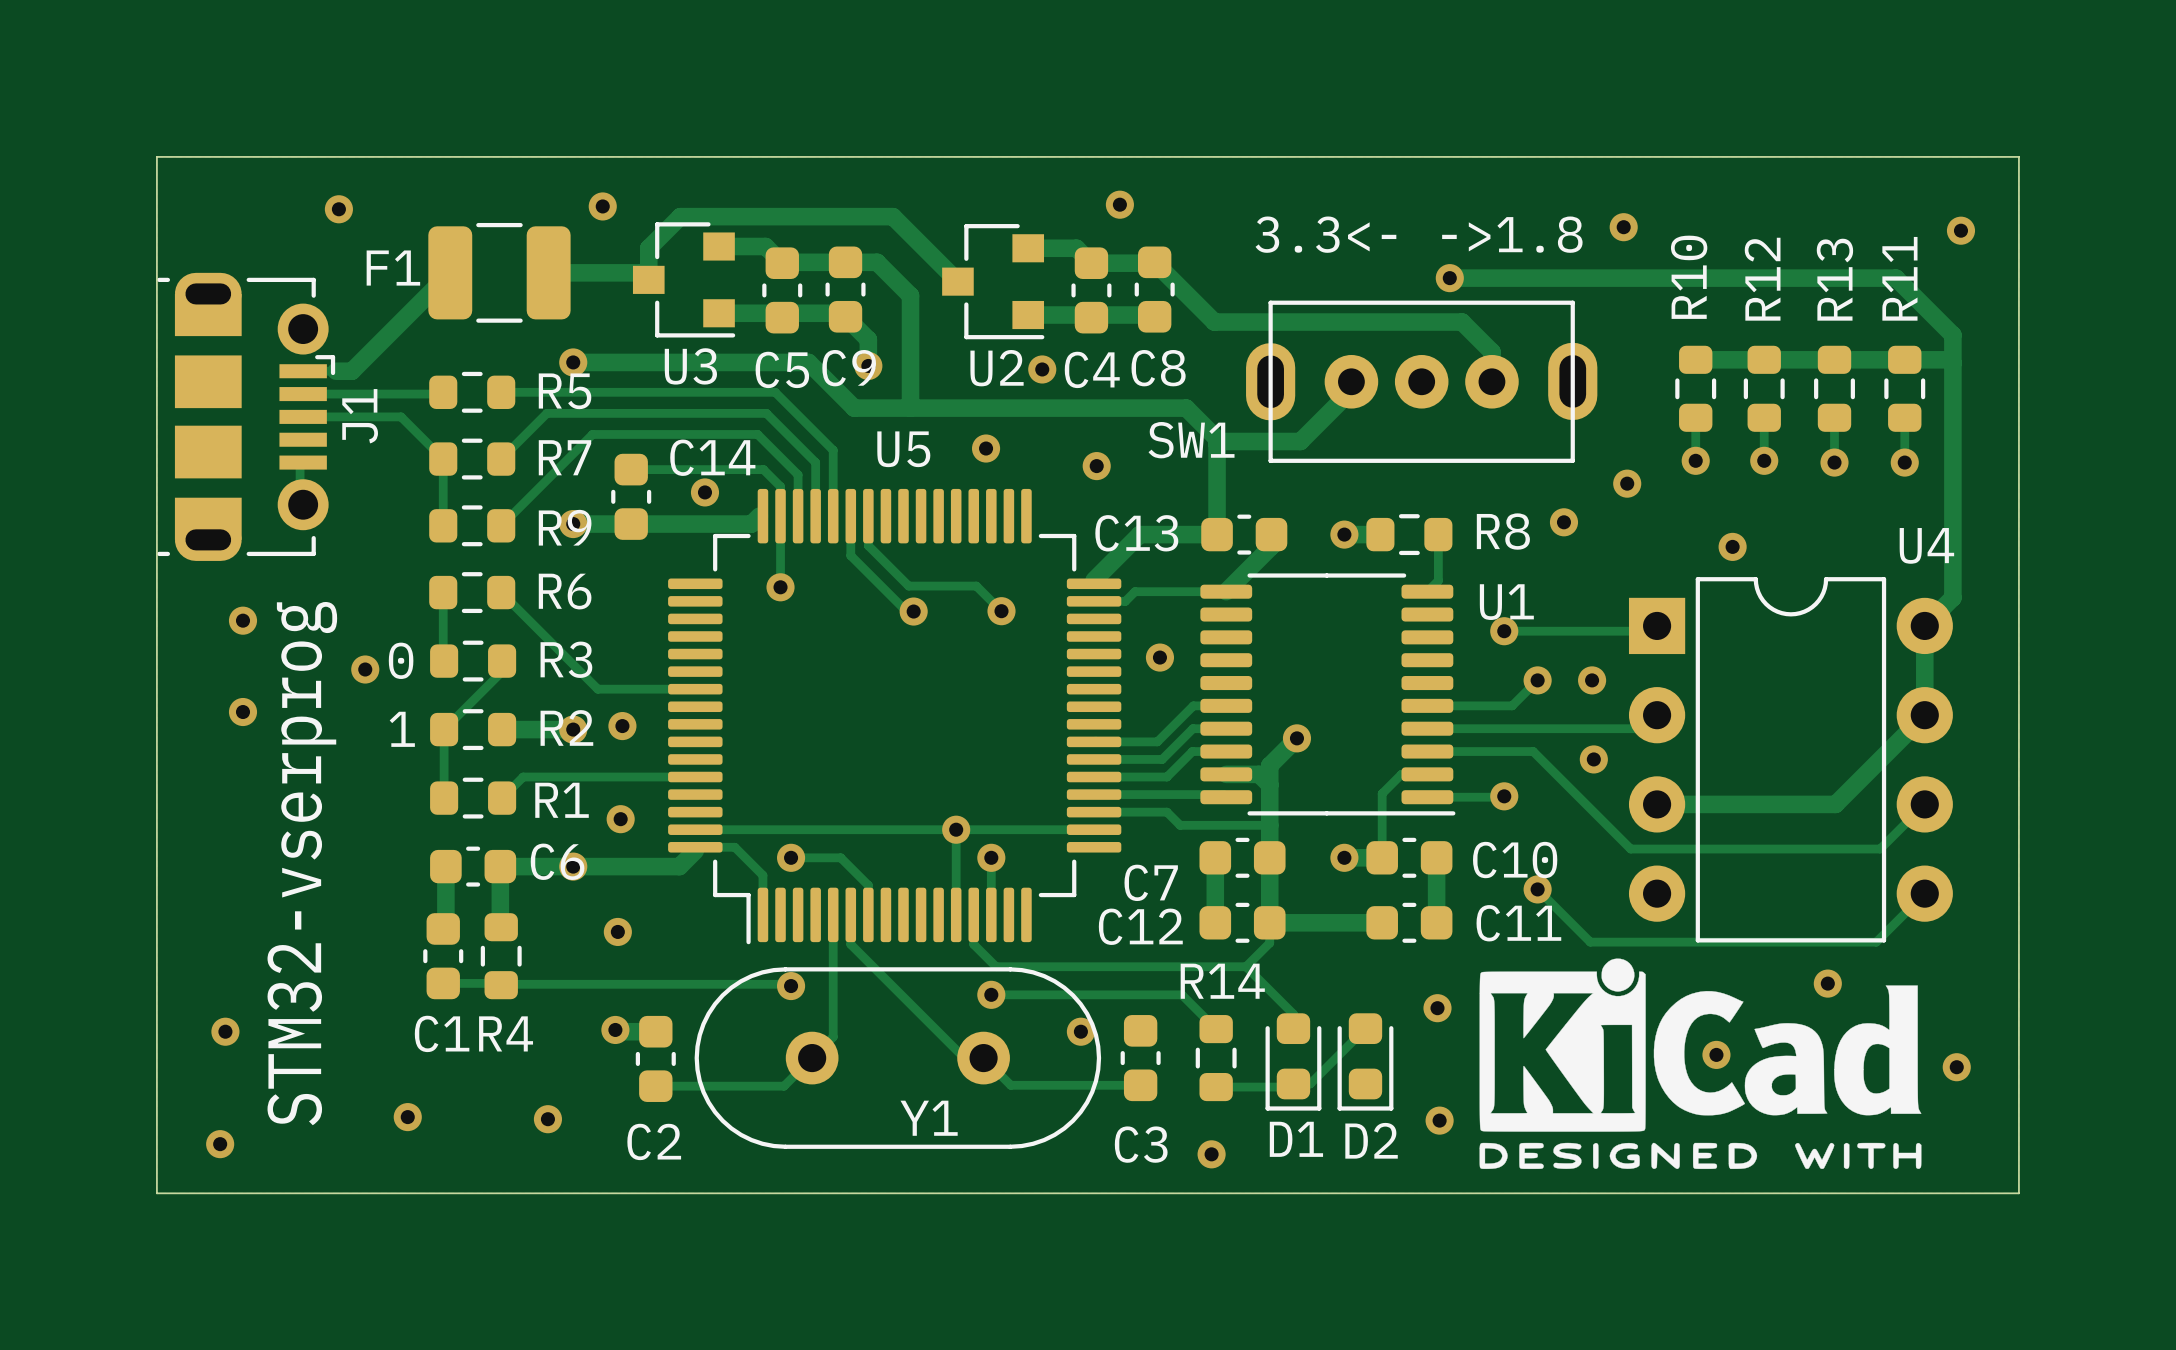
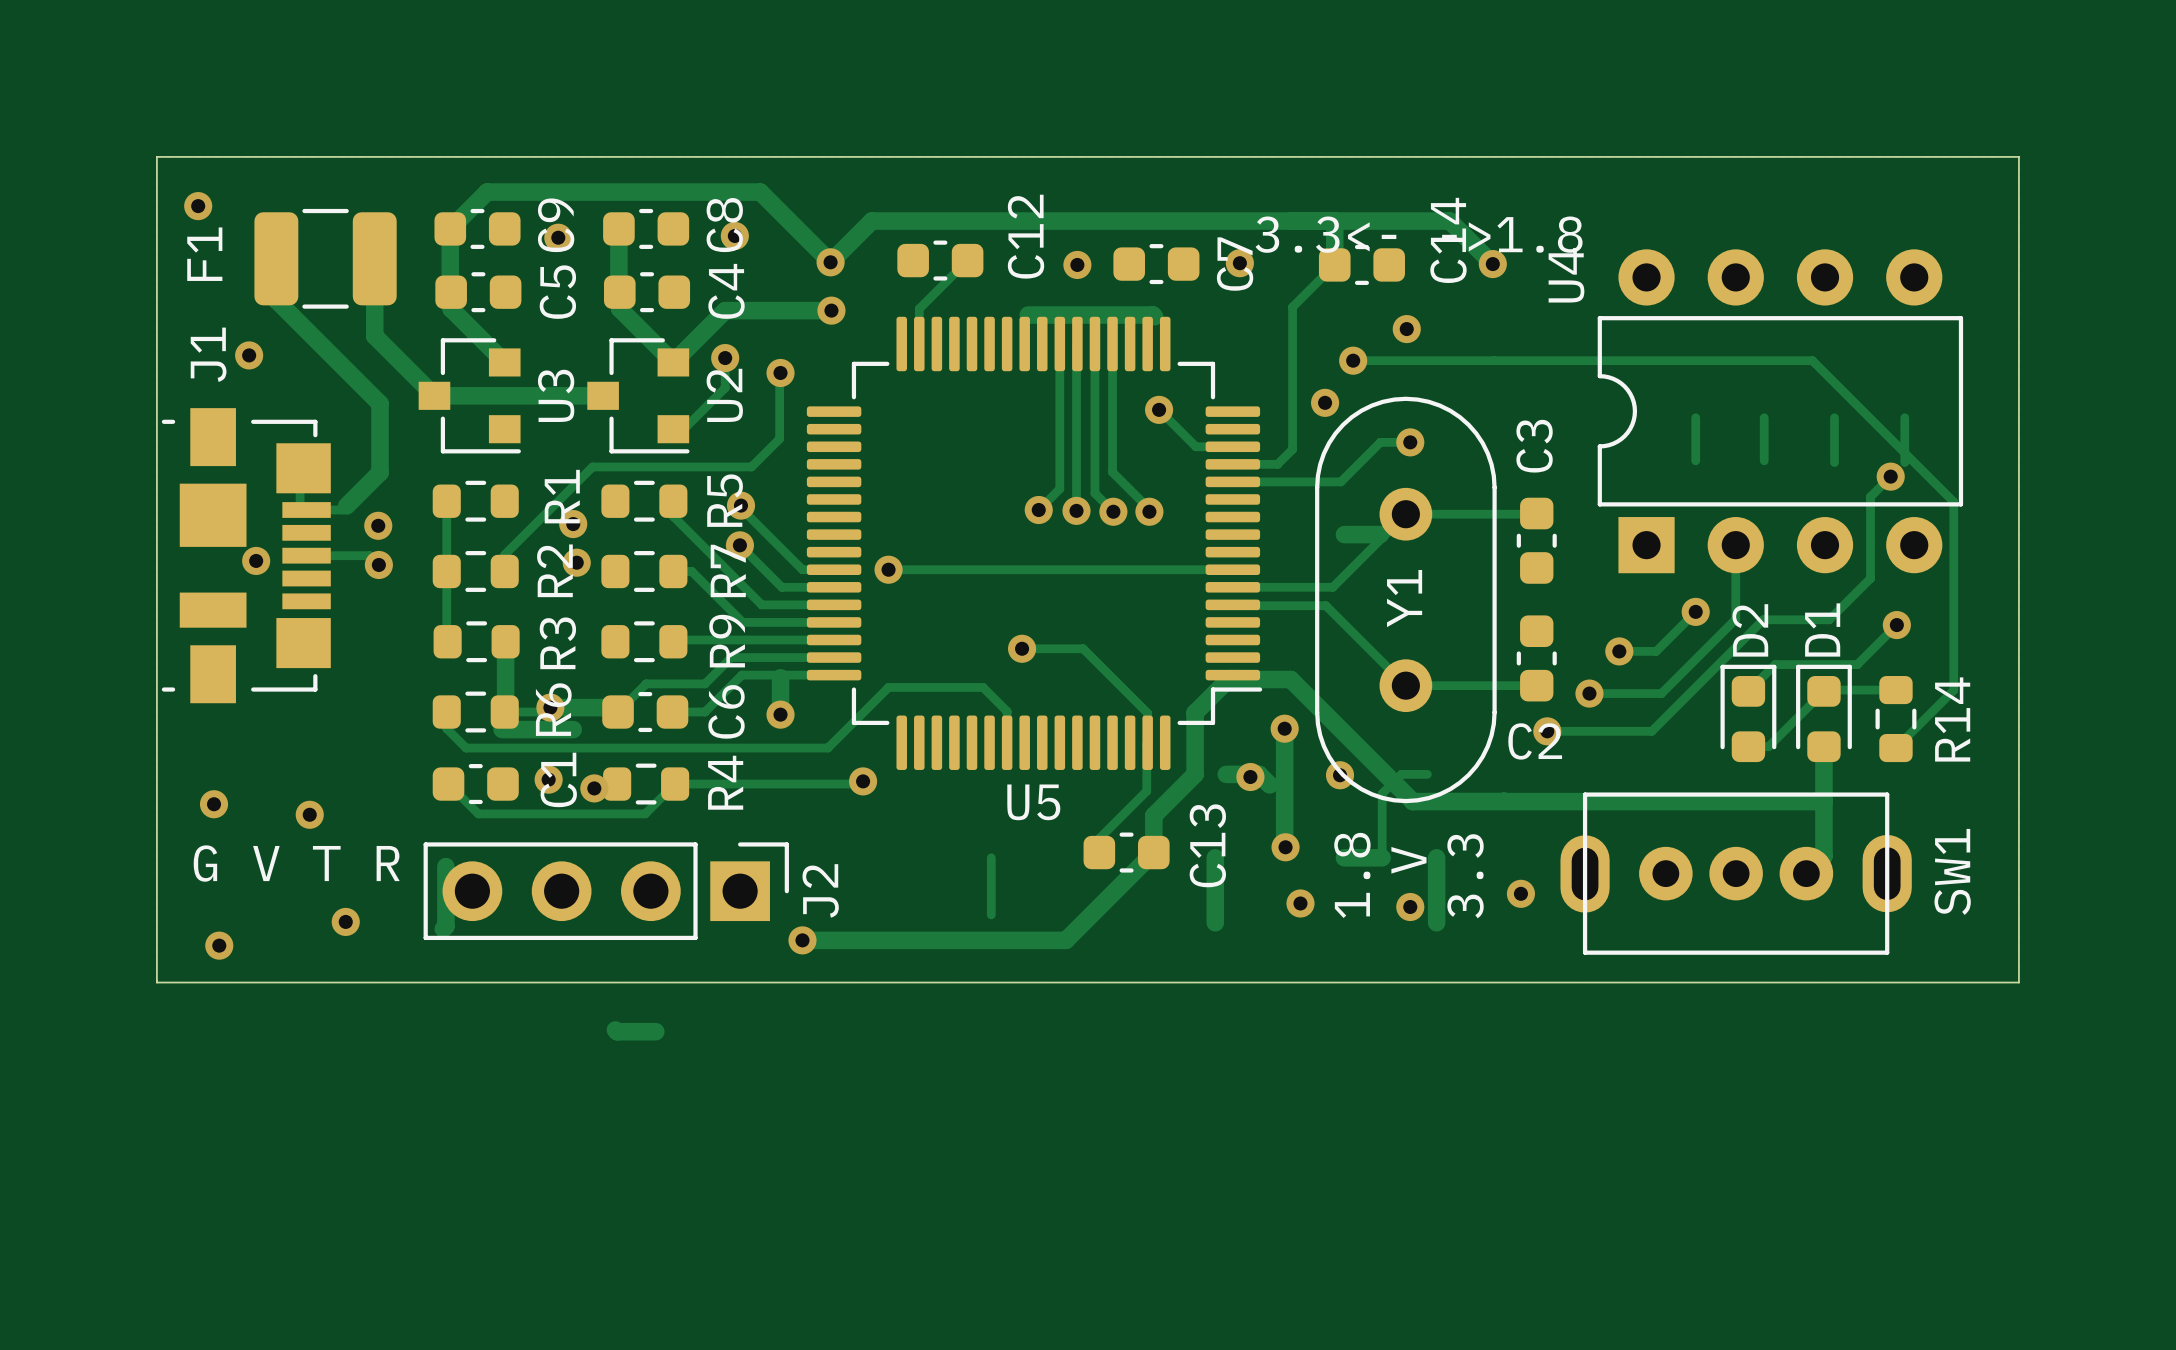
via: (1119, 204) -> none
via: none -> (198, 206)
via position: (602, 206) -> (558, 237)
via: (338, 209) -> none
track: none -> (1334, 221) (1334, 264) (1292, 307) (1292, 449) (1277, 464) (1232, 464)
via: (1623, 227) -> none
track: none -> (618, 228) (619, 308) (673, 362) (725, 310) (831, 310)
via: (1960, 230) -> none
via: none -> (734, 235)
track: (719, 246) (765, 246) (782, 263) (877, 262) (910, 295) (910, 408) -> none
track: (1028, 248) (1076, 248) (1091, 263) (1154, 262) (1214, 322) (1462, 322) (1491, 351) (1491, 381) -> none
track: none -> (276, 258) (276, 300) (380, 403) (380, 472) (342, 510) (306, 510)
track: none -> (374, 258) (374, 336) (434, 395) (603, 395)
track: none -> (967, 260) (919, 308) (919, 344)
via: none -> (830, 262)
via: none -> (1239, 263)
via: none -> (1077, 264)
track: none -> (1492, 264) (1449, 221) (871, 221) (830, 262) (760, 192) (487, 192) (450, 228) (451, 308) (504, 362)
via: none -> (1492, 264)
F1 name rotation: 0° (393, 268) -> 90° counterclockwise (204, 254)
J1 footprint: [157, 272, 336, 561] -> [161, 408, 331, 704]
track: (450, 272) (351, 371) (303, 371) -> none
F1 position: (499, 272) -> (325, 258)
track: (548, 272) (641, 272) (648, 279) (648, 248) (680, 216) (892, 216) (957, 281) -> none
track: (1449, 278) (1895, 278) (1952, 335) (1952, 597) (1924, 625) (1924, 715) (1835, 804) (1657, 804) -> none
via: (1449, 278) -> none
U3 position: (684, 279) -> (469, 395)
U2 position: (993, 281) -> (638, 395)
C9 rotation: 0° (845, 289) -> 90° clockwise (477, 228)
C9 position: (845, 289) -> (477, 228)
C8 rotation: 0° (1154, 289) -> 90° clockwise (646, 228)
C8 position: (1154, 289) -> (646, 228)
C5 rotation: 0° (782, 290) -> 90° clockwise (478, 292)
C5 position: (782, 290) -> (478, 292)
C4 rotation: 0° (1091, 290) -> 90° clockwise (647, 292)
C4 position: (1091, 290) -> (647, 292)
via: none -> (831, 310)
track: (719, 313) (842, 313) (868, 339) (868, 365) -> none
via: none -> (1406, 329)
track: none -> (1059, 344) (1059, 488) (1038, 510)
track: none -> (1077, 344) (1076, 510)
track: none -> (1094, 344) (1094, 493) (1113, 511)
track: none -> (1112, 344) (1112, 472) (1149, 509) (1149, 511)
via: none -> (249, 355)
track: none -> (725, 358) (725, 387) (683, 429) (673, 429)
via: none -> (725, 358)
track: (1695, 359) (1949, 359) (1952, 363) -> none
via: none -> (1353, 360)
track: none -> (1354, 360) (1812, 360) (1953, 501) (1953, 690) (1895, 748)
track: (573, 362) (808, 362) (854, 408) (1186, 408) (1219, 441) -> none
via: (573, 362) -> none
via: (868, 365) -> none
U3 name rotation: 0° (690, 366) -> 90° counterclockwise (556, 395)
U3 name position: U3 (690, 366) -> U3 (556, 395)
C9 name position: C9 (849, 368) -> C9 (556, 225)
U2 name rotation: 0° (997, 368) -> 90° counterclockwise (724, 395)
U2 name position: U2 (997, 368) -> U2 (724, 395)
C8 name position: C8 (1158, 368) -> C8 (724, 225)
C5 name position: C5 (782, 369) -> C5 (557, 292)
via: (1042, 369) -> none
C4 name position: C4 (1092, 369) -> C4 (726, 291)
via: none -> (780, 372)
track: none -> (779, 373) (779, 438) (751, 466) (592, 466) (504, 554) (504, 571)
track: (1351, 381) (1351, 390) (1300, 441) (1219, 441) -> none
SW1 rotation: 0° (1421, 381) -> 180° (1736, 873)
SW1 position: (1421, 381) -> (1736, 873)
R10: (1695, 388) -> none
R12: (1764, 388) -> none
R13: (1834, 388) -> none
R11: (1904, 388) -> none
R5 name rotation: 0° (565, 391) -> 90° counterclockwise (725, 500)
track: (443, 392) (441, 394) (303, 394) -> none
R5 position: (472, 392) -> (644, 501)
track: (501, 392) (775, 392) (833, 450) (833, 516) -> none
via: none -> (1325, 402)
track: none -> (1159, 409) (1195, 446) (1232, 446)
via: none -> (1159, 409)
track: (303, 416) (401, 416) (443, 459) (443, 525) -> none
J1 name position: J1 (360, 416) -> J1 (208, 354)
track: (1219, 441) (1217, 444) (1217, 534) (1139, 534) (1094, 580) -> none
track: none -> (1410, 442) (1380, 442) (1340, 481) (1232, 481)
via: none -> (1410, 442)
via: (986, 448) -> none
U5 name position: U5 (903, 449) -> U5 (1033, 802)
R7 name rotation: 0° (564, 457) -> 90° counterclockwise (728, 570)
R7 position: (472, 459) -> (644, 571)
track: (501, 459) (546, 413) (766, 413) (815, 462) (815, 516) -> none
via: (1695, 460) -> none
via: (1764, 460) -> none
via: (1834, 462) -> none
via position: (1904, 462) -> (1890, 476)
via: (1096, 466) -> none
track: (631, 469) (763, 469) (780, 486) (780, 587) -> none
track: none -> (1890, 476) (1870, 496) (1870, 578) (1829, 619) (1763, 619) (1651, 731) (1547, 731)
via: (1627, 483) -> none
via: (704, 492) -> none
C14 rotation: 0° (631, 496) -> 90° clockwise (1361, 264)
C14 position: (631, 496) -> (1361, 264)
track: none -> (446, 501) (444, 501) (446, 503) (447, 641)
track: none -> (673, 501) (673, 516) (761, 604) (834, 604)
track: none -> (741, 505) (741, 508) (802, 569) (834, 569)
via: none -> (741, 505)
via: none -> (1038, 510)
via: none -> (1076, 510)
via: none -> (1113, 511)
via: none -> (1149, 511)
track: none -> (1536, 513) (1405, 514) (1332, 587) (1232, 587)
track: (759, 516) (751, 524) (573, 524) -> none
track: (798, 516) (798, 474) (757, 434) (592, 434) (501, 525) -> none
track: (850, 516) (850, 555) (906, 611) (913, 611) -> none
track: (868, 516) (868, 545) (908, 586) (976, 586) (1001, 611) -> none
via: (1563, 522) -> none
via: none -> (378, 525)
R9 position: (472, 525) -> (644, 641)
R9 name rotation: 0° (565, 527) -> 90° counterclockwise (727, 641)
C13 name rotation: 0° (1136, 533) -> 90° counterclockwise (1207, 845)
C13 name position: C13 (1136, 533) -> C13 (1207, 845)
C13 position: (1244, 534) -> (1126, 852)
track: (1271, 534) (1271, 546) (1226, 591) (1135, 591) (1125, 601) (1094, 601) -> none
via: (1344, 534) -> none
R8: (1409, 534) -> none
track: (1438, 534) (1438, 580) (1427, 591) -> none
track: none -> (739, 545) (781, 587) (834, 587)
via: none -> (739, 545)
track: none -> (1735, 545) (1735, 619) (1661, 693) (1589, 693)
via: (1732, 546) -> none
track: none -> (306, 555) (369, 555) (378, 564)
via: none -> (576, 562)
via: none -> (378, 564)
track: none -> (888, 569) (1232, 569)
track: none -> (673, 571) (691, 571) (742, 622) (834, 622)
via: (780, 587) -> none
R6 name rotation: 0° (565, 591) -> 90° counterclockwise (553, 709)
track: (443, 592) (444, 661) -> none
R6 position: (472, 592) -> (475, 712)
track: (501, 592) (597, 689) (695, 689) -> none
track: none -> (1232, 604) (1325, 605) (1405, 685) (1536, 685)
via position: (913, 611) -> (888, 569)
via position: (1001, 611) -> (1022, 648)
track: none -> (1695, 611) (1656, 651) (1619, 651)
via: none -> (1695, 611)
via position: (242, 620) -> (256, 560)
track: (1657, 625) (1651, 631) (1504, 631) -> none
track: none -> (1896, 625) (1857, 664) (1775, 664) (1748, 691)
via: none -> (1896, 625)
via: (1504, 631) -> none
track: none -> (834, 639) (675, 639) (673, 641)
track: none -> (505, 641) (504, 712) (546, 712) (550, 707) (613, 707) (618, 712) (646, 683) (704, 683) (731, 657) (834, 657)
track: none -> (1022, 648) (1083, 648) (1147, 713) (1146, 791) (1099, 838) (1099, 852)
via: none -> (1619, 651)
via: (1159, 657) -> none
R3 name rotation: 0° (566, 659) -> 90° counterclockwise (557, 643)
text: 0 (401, 660) -> none
R3 position: (473, 661) -> (476, 641)
track: (502, 661) (502, 671) (444, 729) (444, 798) -> none
via: (365, 669) -> none
track: none -> (834, 675) (741, 675) (704, 712) (672, 712)
track: none -> (780, 677) (780, 714)
track: (1537, 680) (1512, 705) (1427, 705) -> none
via: (1537, 680) -> none
via position: (1592, 680) -> (1589, 693)
track: none -> (1895, 690) (1825, 690) (1768, 746) (1748, 746)
U1: (1327, 694) -> none
track: (1226, 705) (1193, 705) (1157, 741) (1094, 741) -> none
via: (242, 712) -> none
track: none -> (446, 712) (446, 728) (466, 748) (827, 748) (888, 687) (983, 687) (1007, 711) (1007, 742)
via: none -> (780, 714)
track: (1657, 715) (1643, 728) (1427, 728) -> none
U5 rotation: 0° (894, 716) -> 90° counterclockwise (1034, 543)
via: (622, 726) -> none
R2 name rotation: 0° (566, 727) -> 90° counterclockwise (554, 570)
track: (1226, 728) (1192, 728) (1162, 759) (1094, 759) -> none
track: none -> (1284, 728) (1285, 847)
text: 1 (402, 729) -> none
R2 position: (473, 729) -> (475, 571)
via position: (573, 729) -> (550, 707)
via: none -> (1547, 731)
track: (1296, 738) (1269, 765) (1269, 922) -> none
via position: (1296, 738) -> (1284, 728)
track: none -> (1823, 746) (1823, 856) (1806, 873)
track: (1226, 751) (1192, 751) (1166, 777) (1094, 777) -> none
track: (1427, 751) (1533, 751) (1630, 849) (1880, 849) (1924, 804) -> none
via: (1593, 759) -> none
U4 rotation: 0° (1790, 759) -> 90° counterclockwise (1780, 411)
U4 position: (1790, 759) -> (1780, 411)
via: none -> (1340, 775)
track: (695, 777) (523, 777) (502, 798) -> none
via: none -> (1250, 777)
via: none -> (548, 779)
track: none -> (863, 781) (860, 784) (675, 784) (645, 813) (478, 813) (448, 784)
via: none -> (863, 781)
via: none -> (594, 788)
track: (1094, 794) (1223, 794) (1226, 797) -> none
via: (1504, 796) -> none
R1 position: (473, 798) -> (475, 501)
R1 name rotation: 0° (562, 800) -> 90° counterclockwise (562, 496)
track: none -> (1823, 801) (1412, 801) (1290, 679) (1229, 678) (1195, 712) (1195, 774) (1153, 815) (1153, 852) (1065, 940) (802, 940)
via: none -> (214, 804)
track: (1094, 812) (1166, 812) (1180, 825) (1269, 825) -> none
via: none -> (309, 814)
via: (620, 819) -> none
track: (695, 829) (1094, 829) -> none
track: (956, 829) (956, 914) -> none
via: (956, 829) -> none
track: (695, 847) (734, 847) (762, 875) (762, 914) -> none
via: none -> (1285, 847)
track: (695, 850) (679, 866) (500, 866) (501, 927) -> none
track: (791, 857) (840, 857) (868, 885) (868, 914) -> none
via: (791, 857) -> none
via: (991, 857) -> none
C7 position: (1242, 857) -> (1156, 264)
via: (1344, 857) -> none
C10: (1409, 857) -> none
text: none -> V (1408, 860)
C6 name rotation: 0° (557, 861) -> 90° counterclockwise (726, 711)
text: STM32-vserprog (302, 863) -> G V T R (296, 863)
C6 position: (473, 866) -> (645, 712)
via: (573, 866) -> none
text: none -> 1.8 (1352, 875)
text: none -> 3.3 (1465, 876)
C7 name rotation: 0° (1151, 882) -> 90° counterclockwise (1235, 264)
C7 name position: C7 (1151, 882) -> C7 (1235, 264)
track: (1537, 889) (1590, 942) (1876, 942) (1924, 893) -> none
via position: (1537, 889) -> (1520, 893)
J2: none -> (606, 891)
via: none -> (1300, 903)
via: none -> (1410, 907)
track: (833, 914) (833, 1036) (784, 1086) (655, 1086) -> none
track: (850, 914) (850, 944) (964, 1058) (983, 1058) (1010, 1085) (1140, 1085) -> none
track: (973, 914) (973, 944) (996, 966) (1246, 966) -> none
via: none -> (345, 921)
C12 position: (1242, 922) -> (940, 260)
track: (1269, 922) (1269, 943) (1246, 966) -> none
track: (1269, 922) (1383, 922) -> none
C11: (1409, 922) -> none
C12 name rotation: 0° (1140, 926) -> 90° counterclockwise (1026, 236)
C12 name position: C12 (1140, 926) -> C12 (1026, 236)
via: (617, 931) -> none
via: none -> (802, 940)
via: none -> (219, 945)
C1 rotation: 0° (443, 956) -> 90° clockwise (475, 784)
C1 position: (443, 956) -> (475, 784)
R4 rotation: 0° (501, 956) -> 90° clockwise (646, 784)
R4 position: (501, 956) -> (646, 784)
drawing: [1479, 958, 1922, 1170] -> none
track: (1246, 966) (1293, 1014) (1293, 1028) -> none
R14 name rotation: 0° (1222, 981) -> 90° counterclockwise (1952, 719)
board edge: (156, 982) (156, 1193) (2018, 1193) (2018, 982) -> (156, 982) (2018, 982)
track: (443, 983) (499, 983) (501, 985) (789, 984) (791, 986) -> none
via: (1827, 983) -> none
via: (791, 986) -> none
track: (991, 994) (1181, 994) (1216, 1029) -> none
via: (991, 994) -> none
via: (1437, 1008) -> none
track: (1365, 1028) (1310, 1083) (1293, 1083) (1290, 1087) (1216, 1087) -> none
via: (615, 1029) -> none
via: (225, 1031) -> none
via: (1080, 1031) -> none
C1 name position: C1 (442, 1033) -> C1 (558, 779)
R4 name position: R4 (506, 1033) -> R4 (725, 782)
via: (1716, 1054) -> none
C2 position: (655, 1058) -> (1536, 658)
Y1 rotation: 0° (897, 1058) -> 90° clockwise (1405, 599)
Y1 position: (897, 1058) -> (1405, 599)
C3 position: (1140, 1058) -> (1536, 540)
R14 position: (1216, 1058) -> (1895, 719)
D1 rotation: 0° (1293, 1061) -> 180° (1823, 713)
D1 position: (1293, 1061) -> (1823, 713)
D2 rotation: 0° (1365, 1061) -> 180° (1748, 713)
D2 position: (1365, 1061) -> (1748, 713)
via: (1956, 1067) -> none
via: (407, 1117) -> none
Y1 name position: Y1 (929, 1118) -> Y1 (1404, 598)
via: (547, 1119) -> none
via: (1439, 1120) -> none
via: (220, 1144) -> none
C3 name rotation: 0° (1141, 1144) -> 90° counterclockwise (1534, 446)
C3 name position: C3 (1141, 1144) -> C3 (1534, 446)
via: (1211, 1154) -> none

